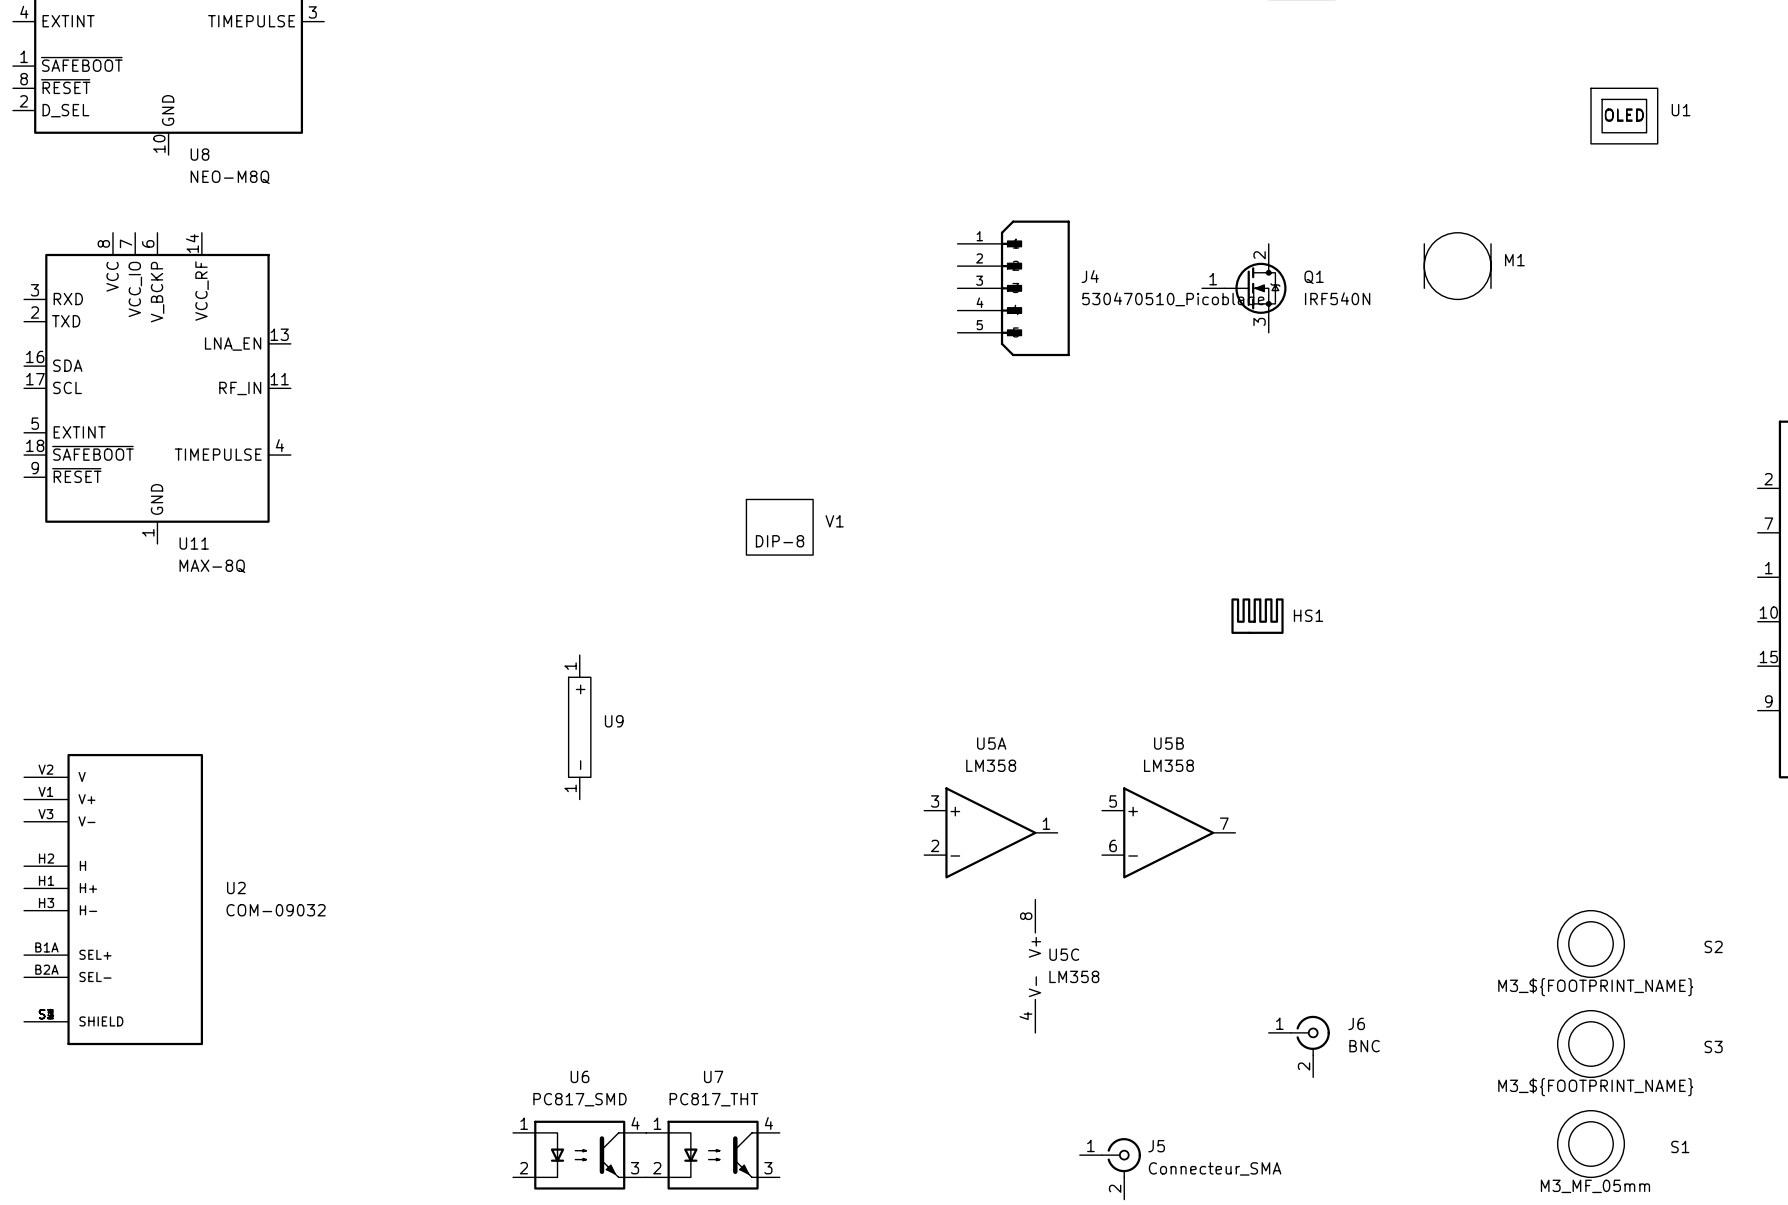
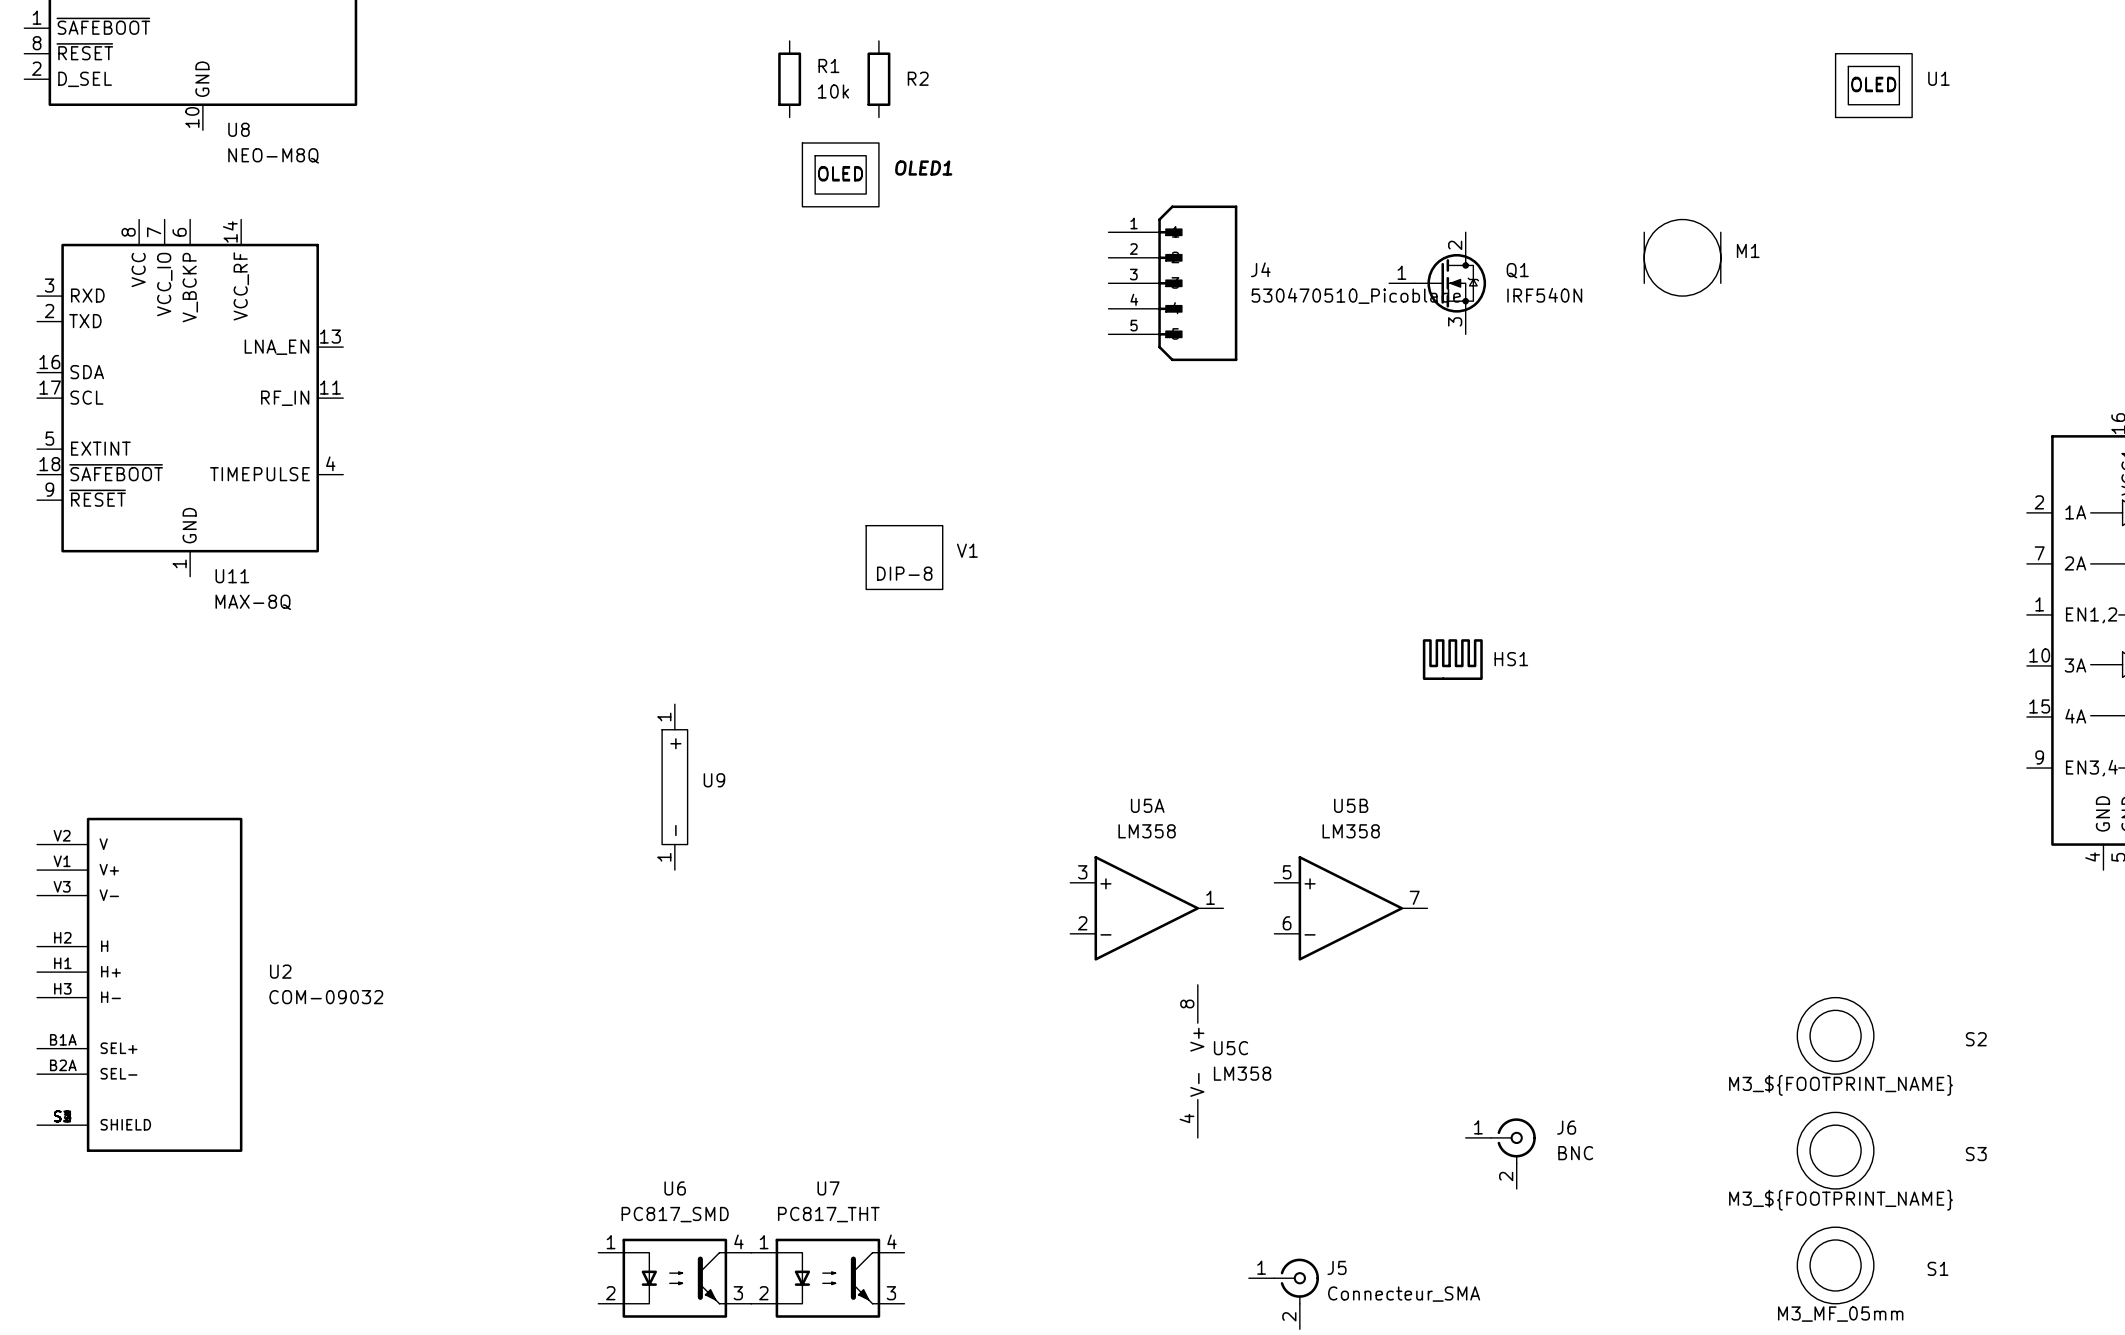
R1: none -> 10k (789, 79)
R2: none -> (878, 79)
OLED1: none -> (840, 174)

